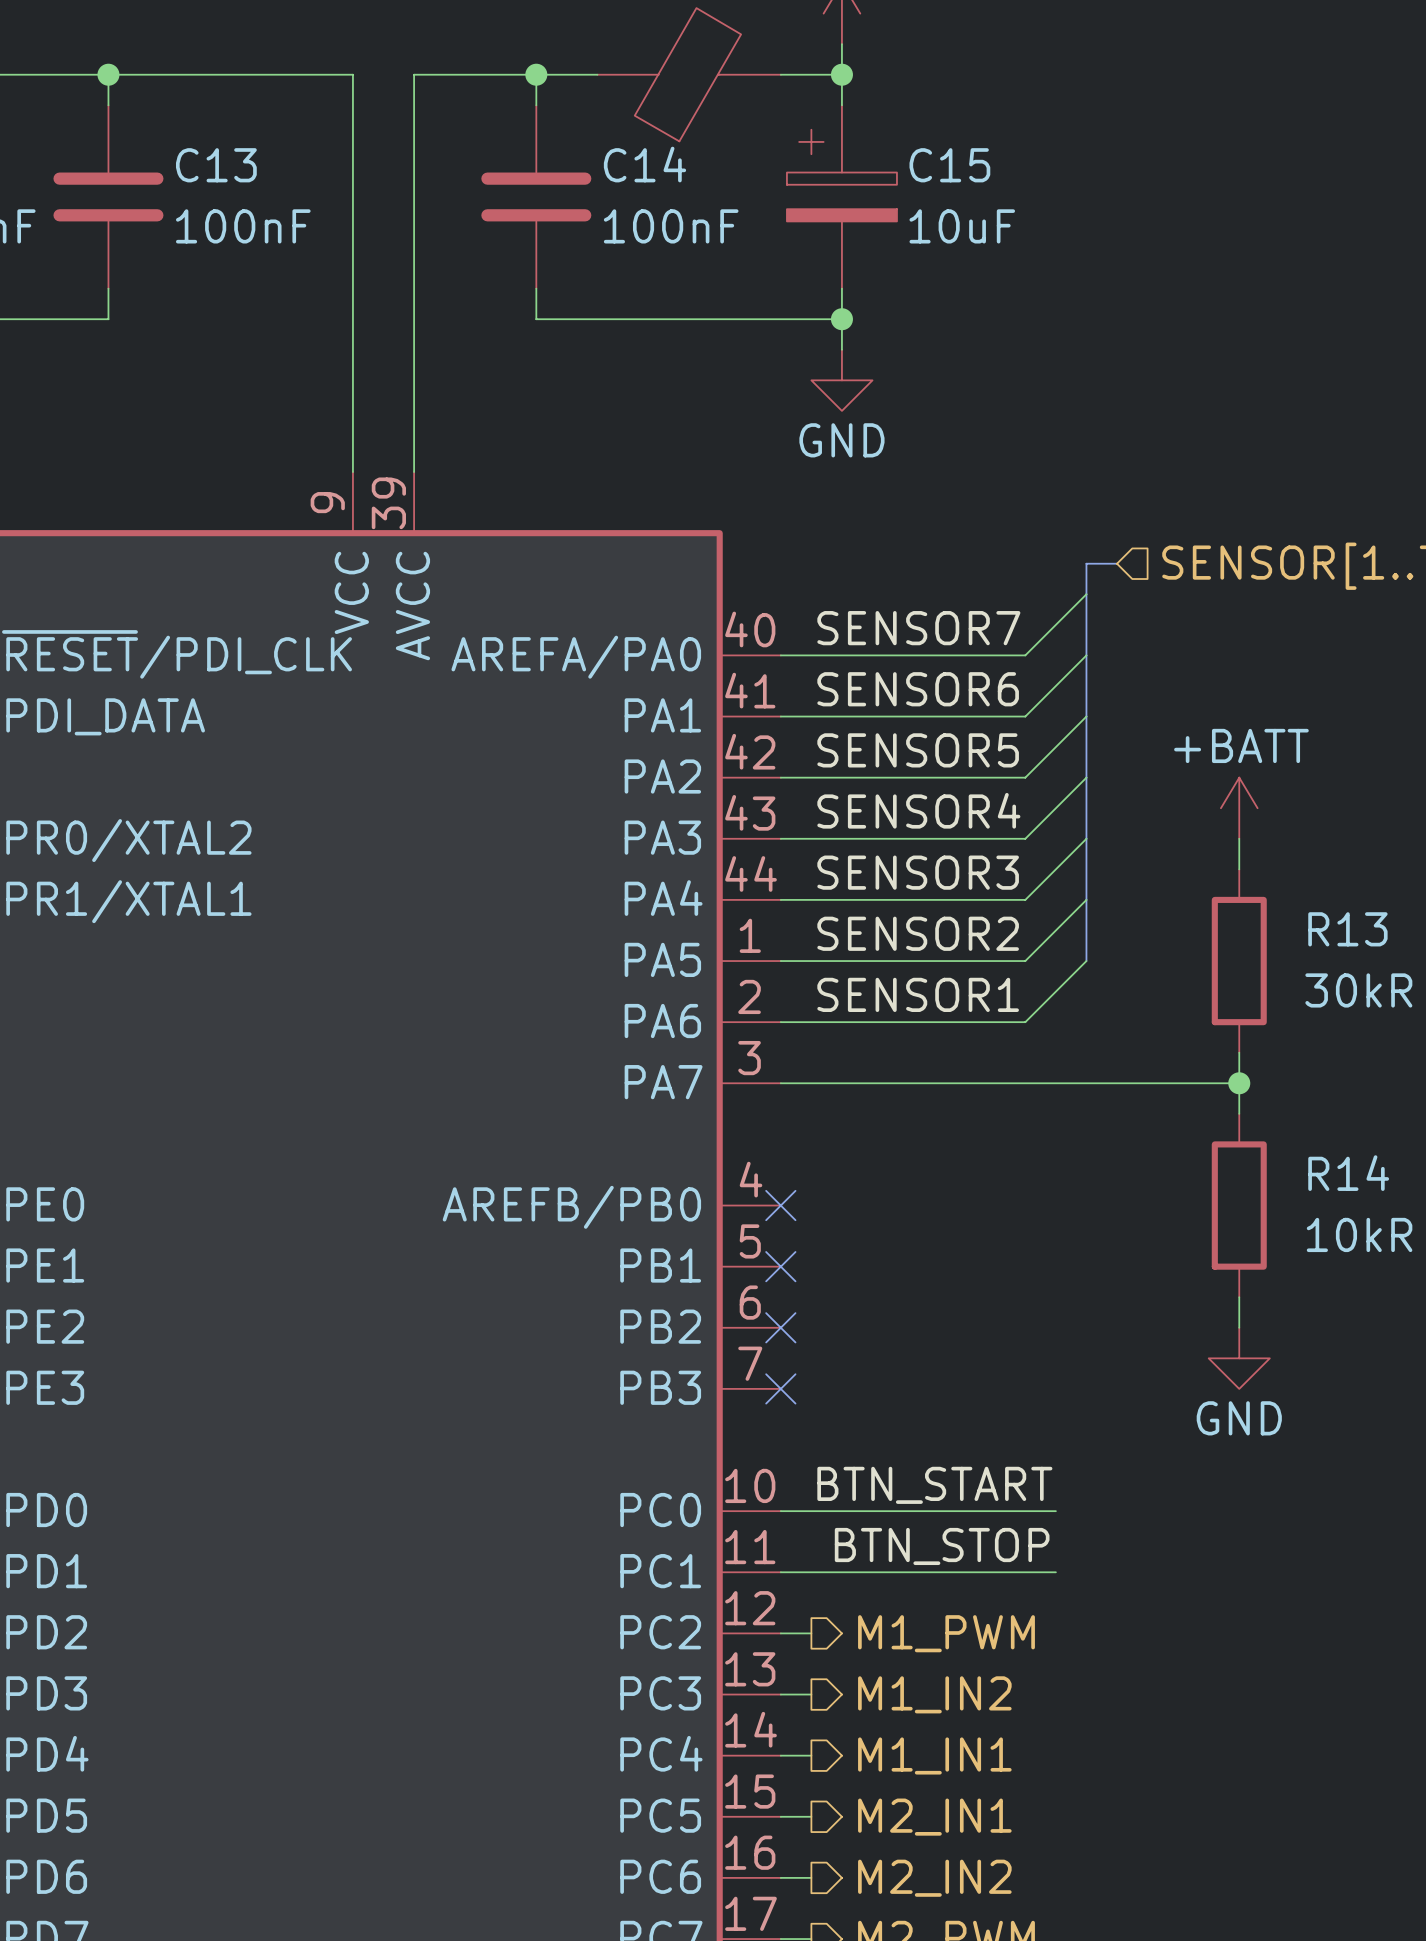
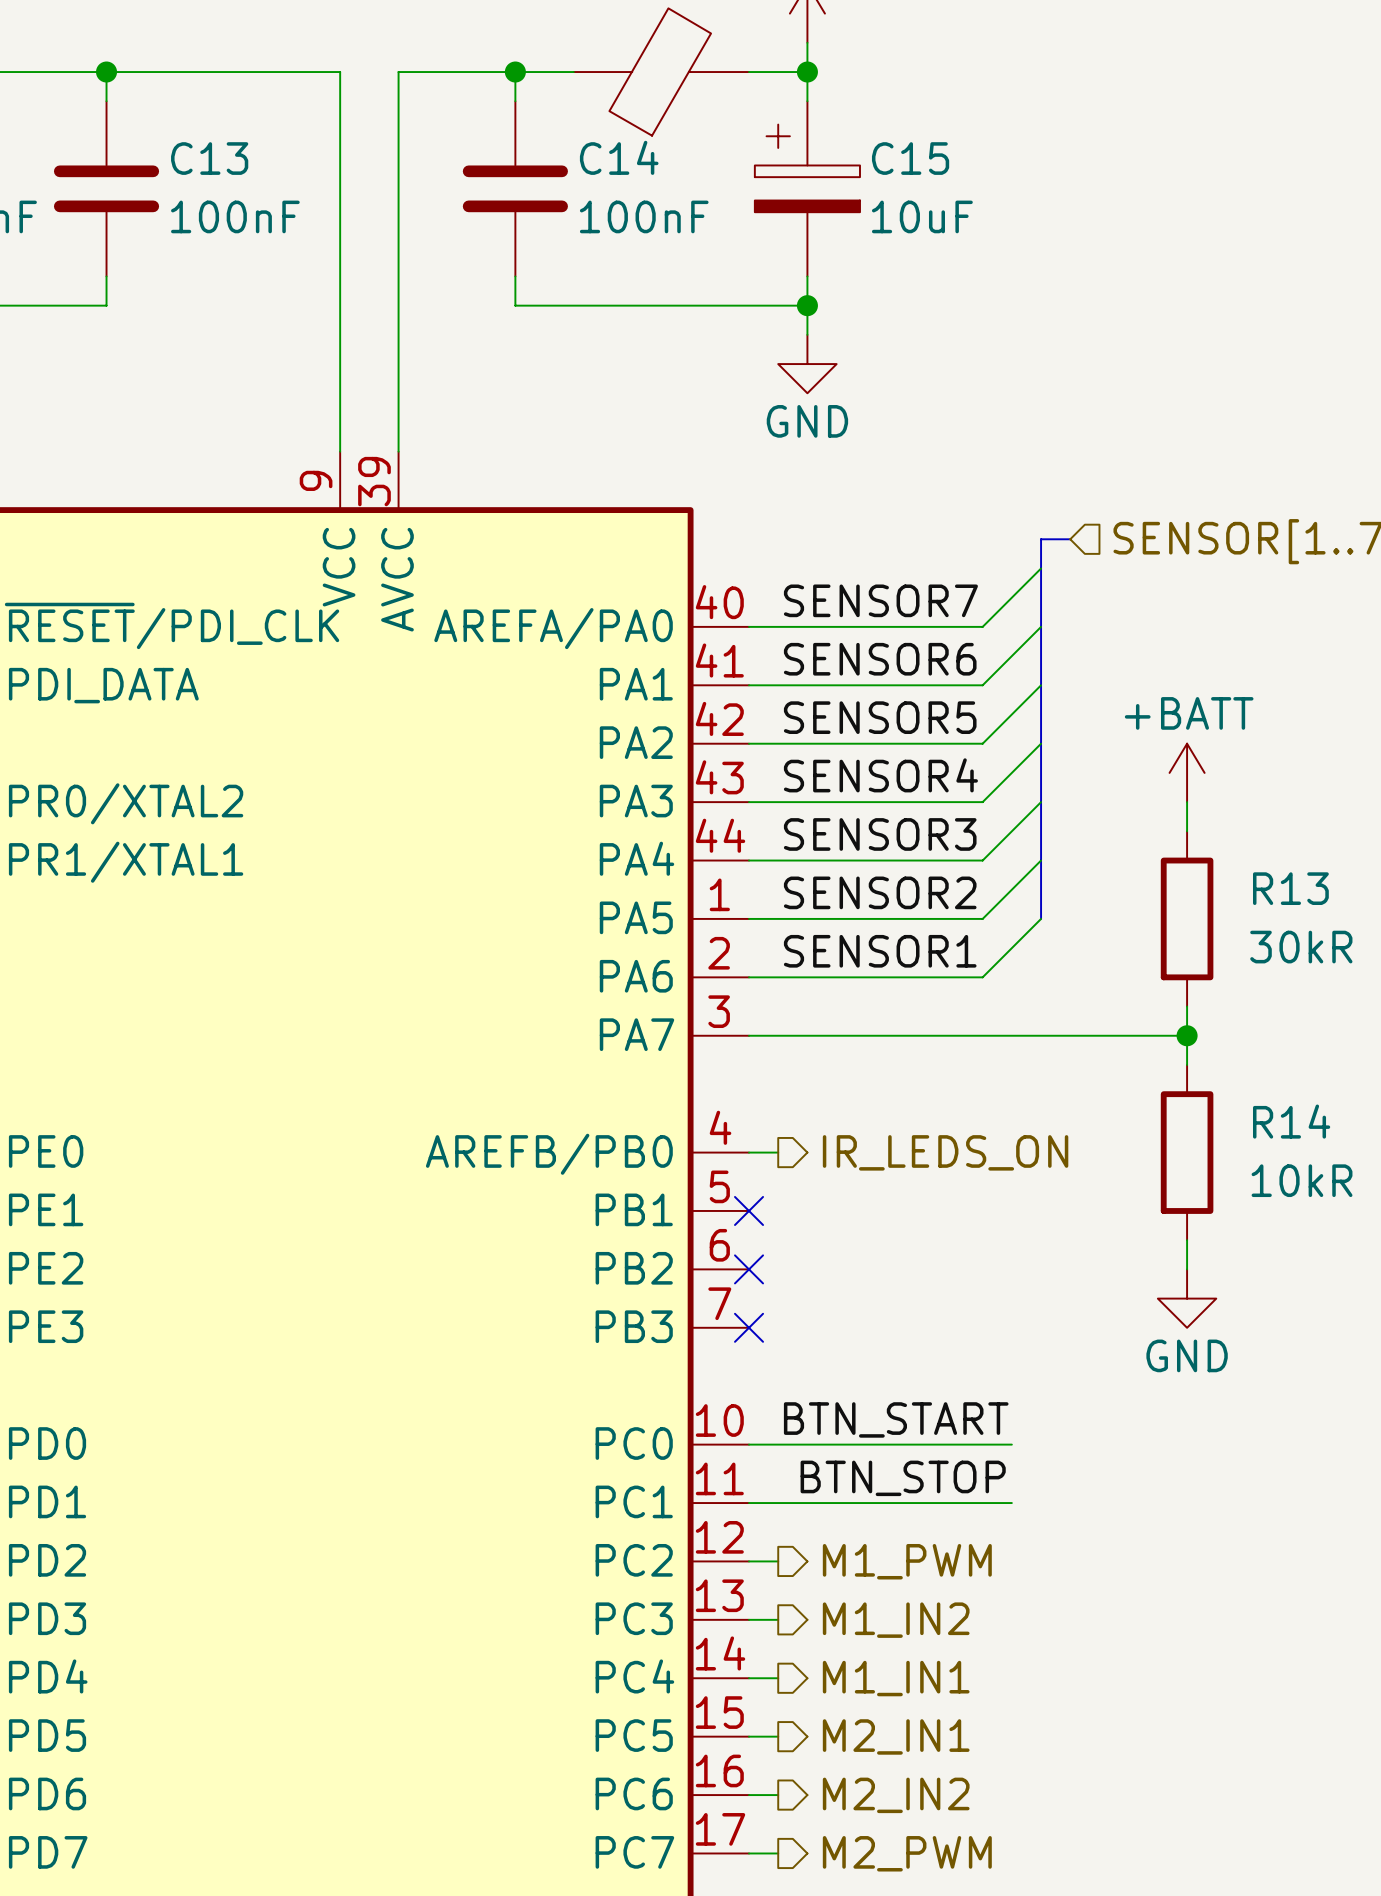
wire: none -> (749, 1152) (778, 1152)
no-connect mark: (780, 1205) -> none
hierarchical label: none -> IR_LEDS_ON (945, 1152)

